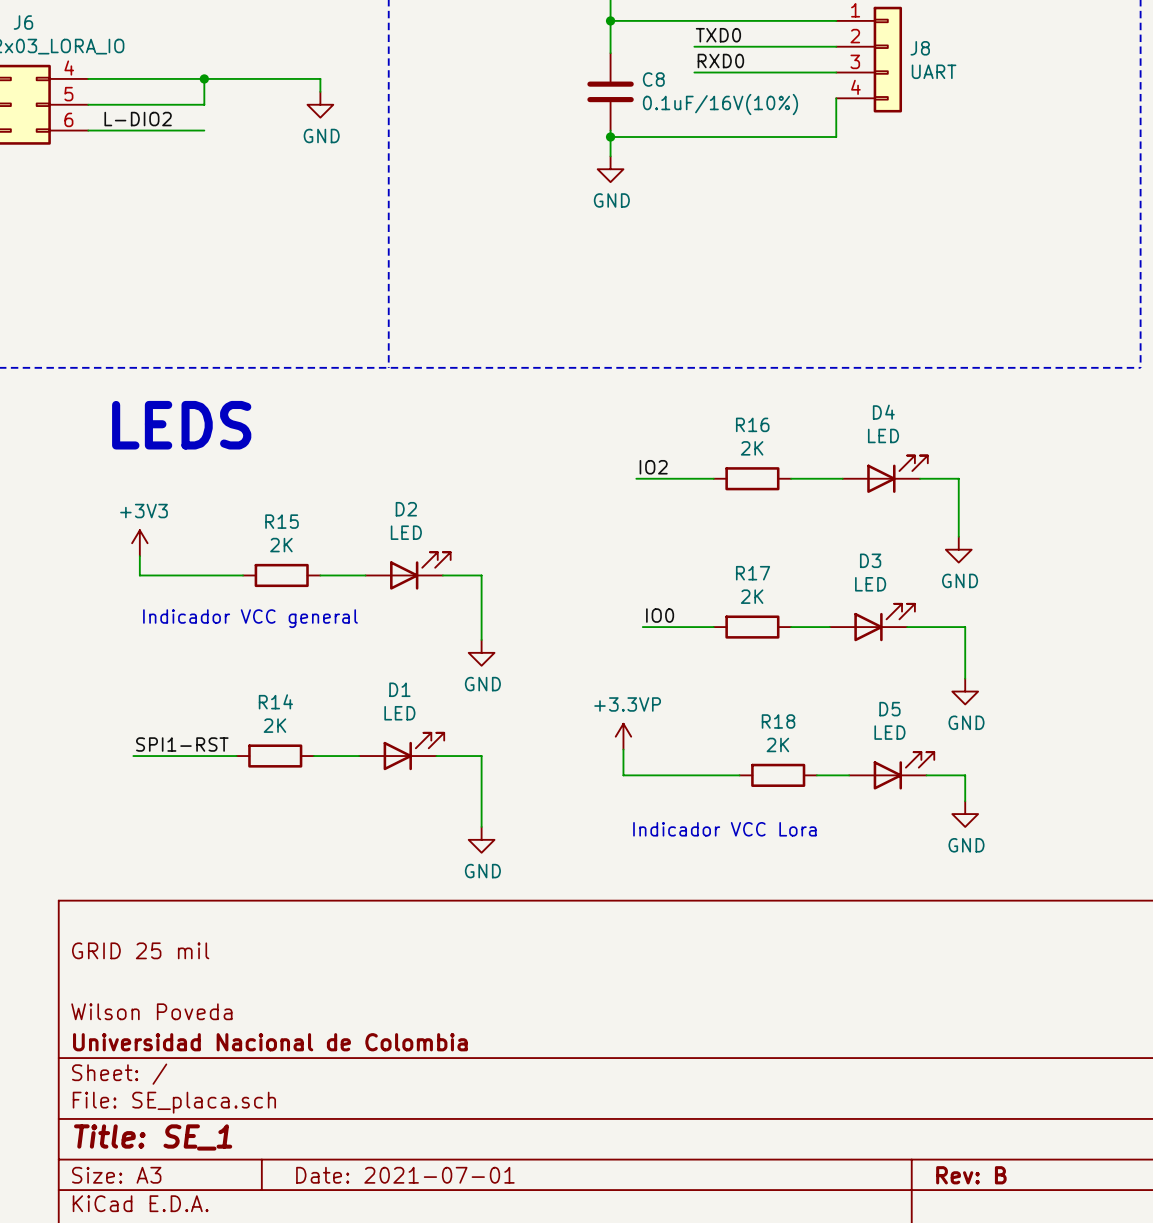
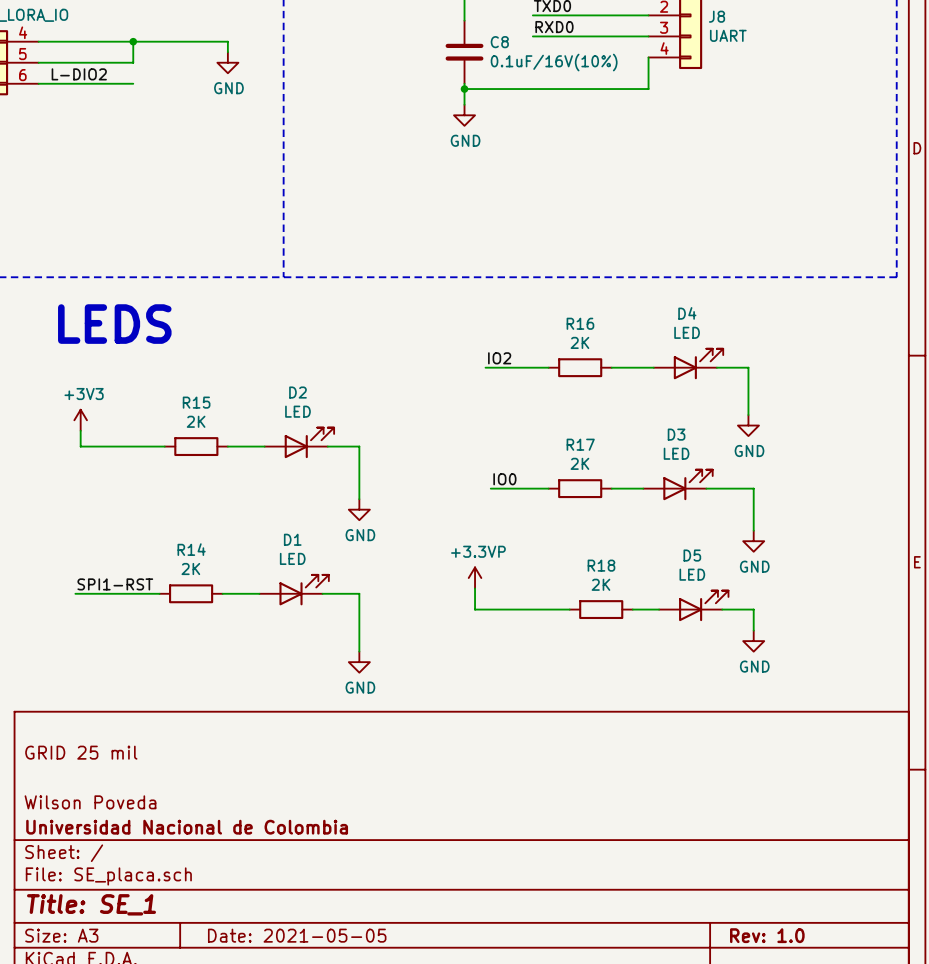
text: Indicador VCC general (250, 618) -> none
text: Indicador VCC Lora (724, 829) -> none
title block: Date: 2021-07-01 (405, 1175) -> Date: 2021-05-05 (297, 935)
title block: Rev: B (971, 1175) -> Rev: 1.0 (767, 935)

